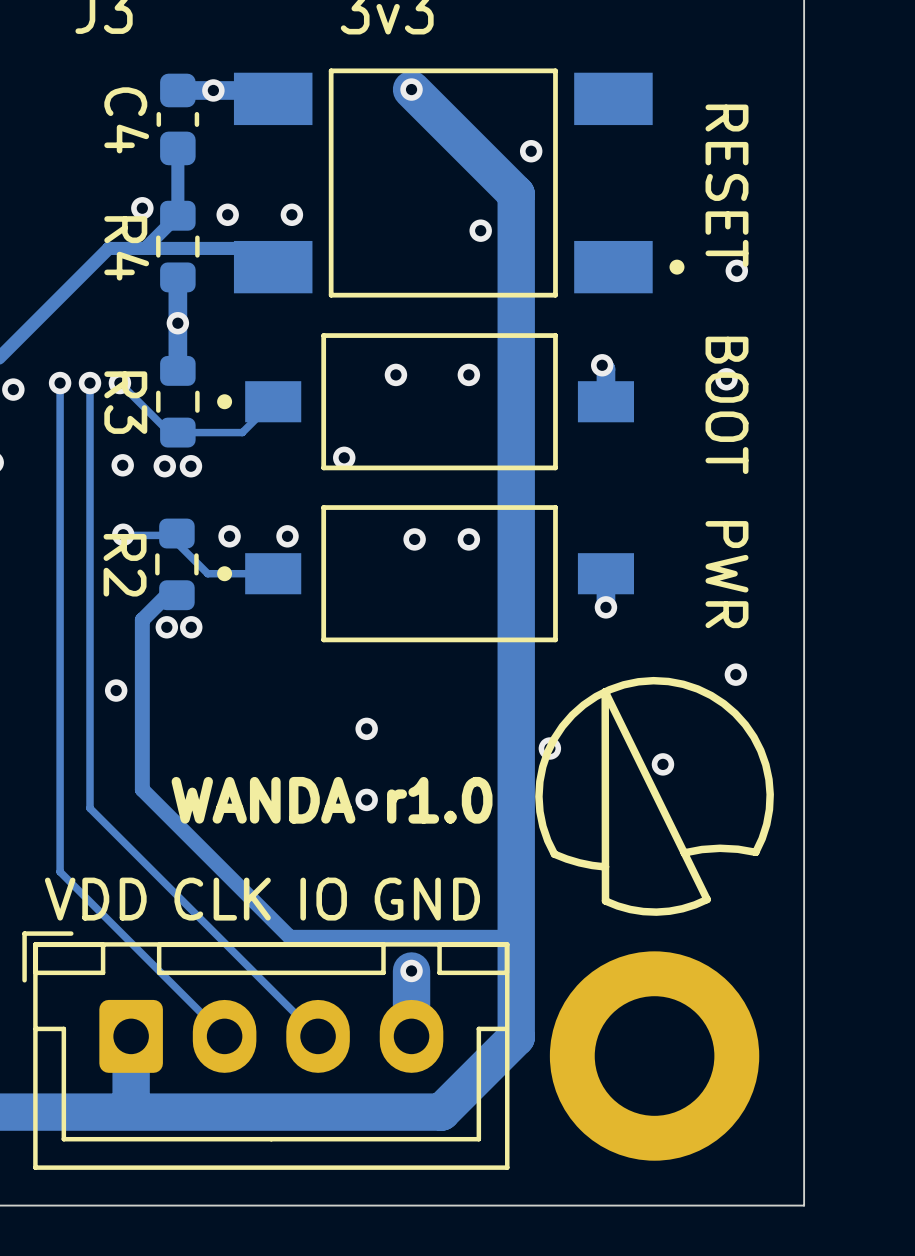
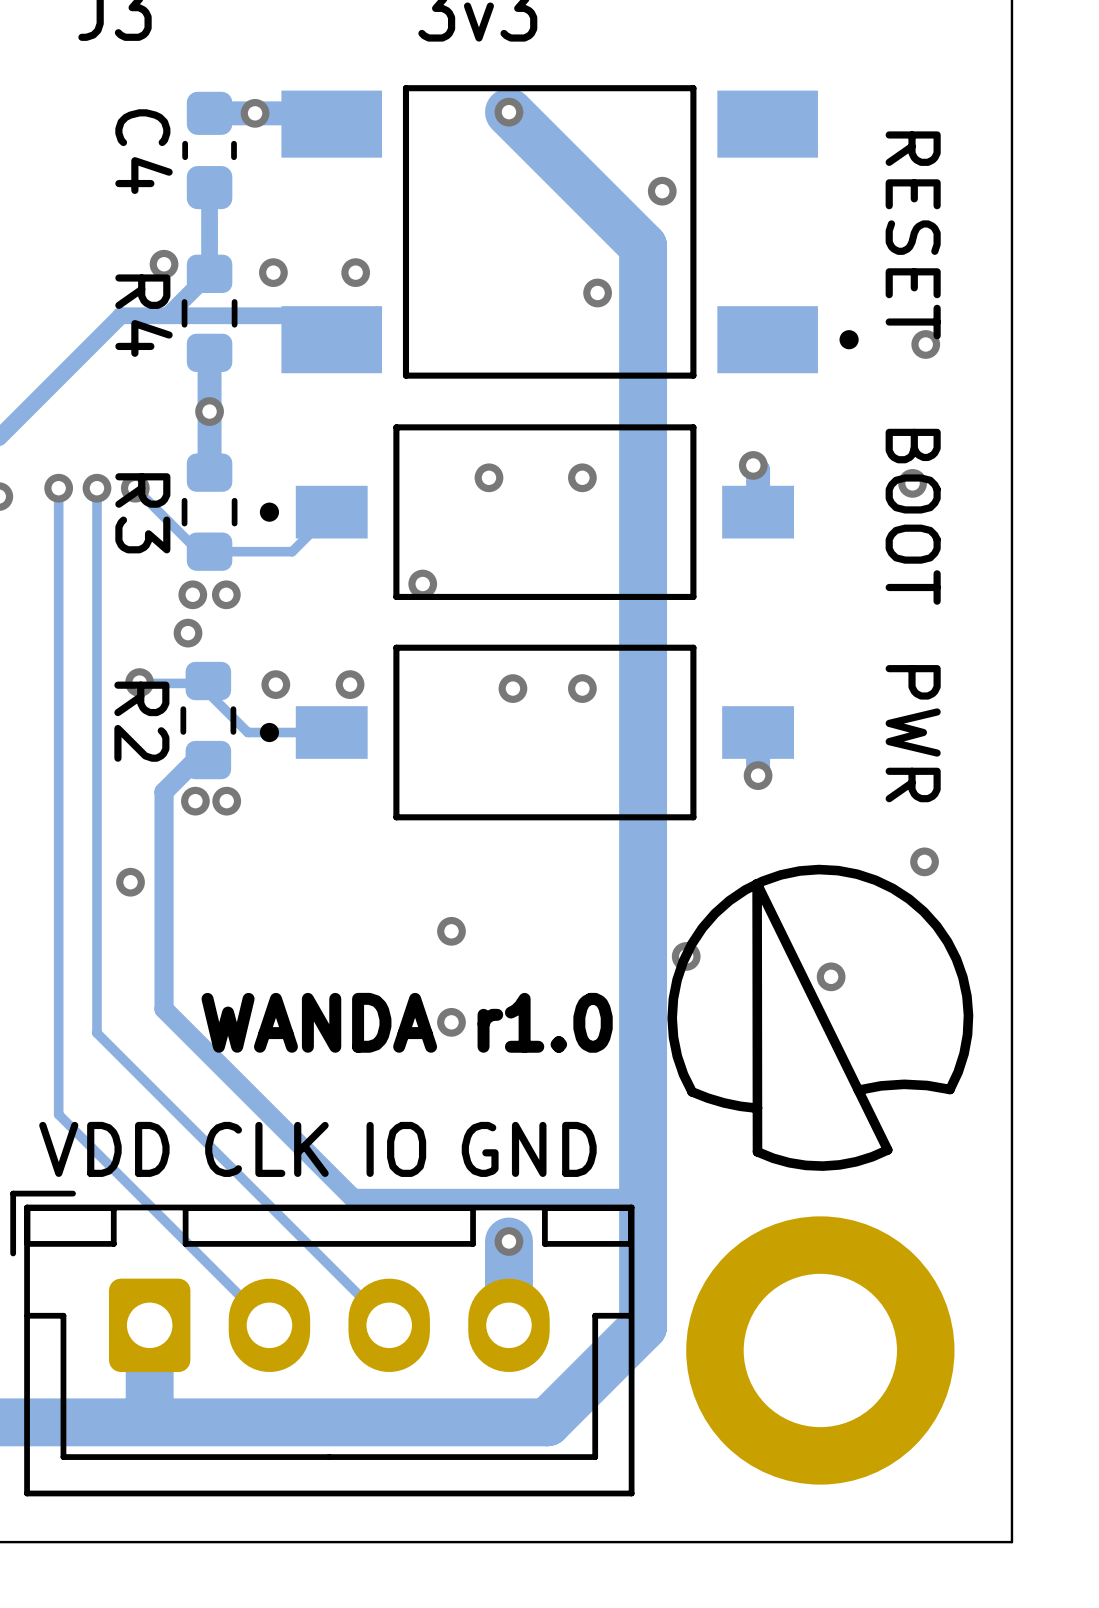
via position: (122, 465) -> (188, 633)

